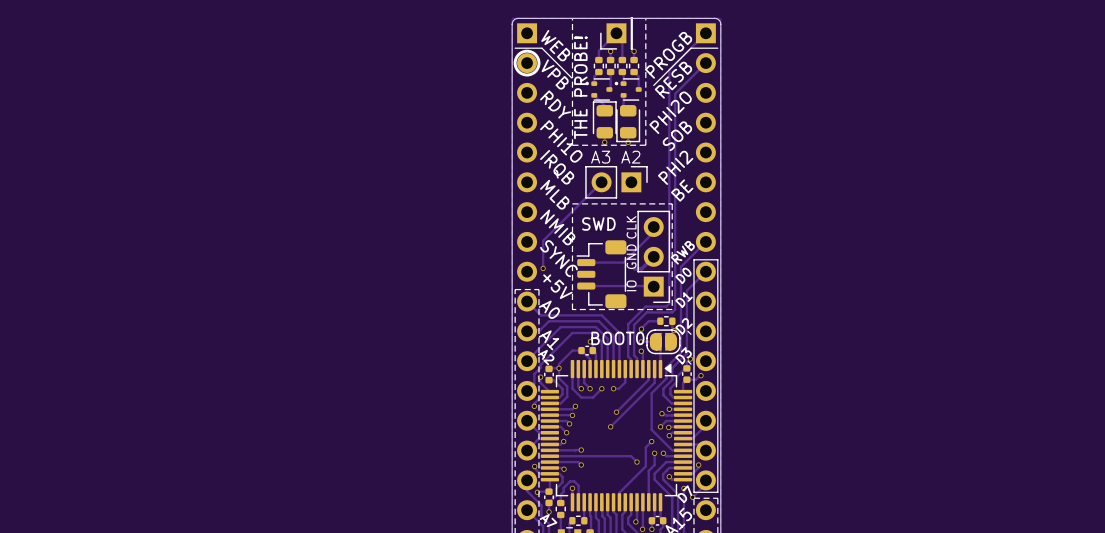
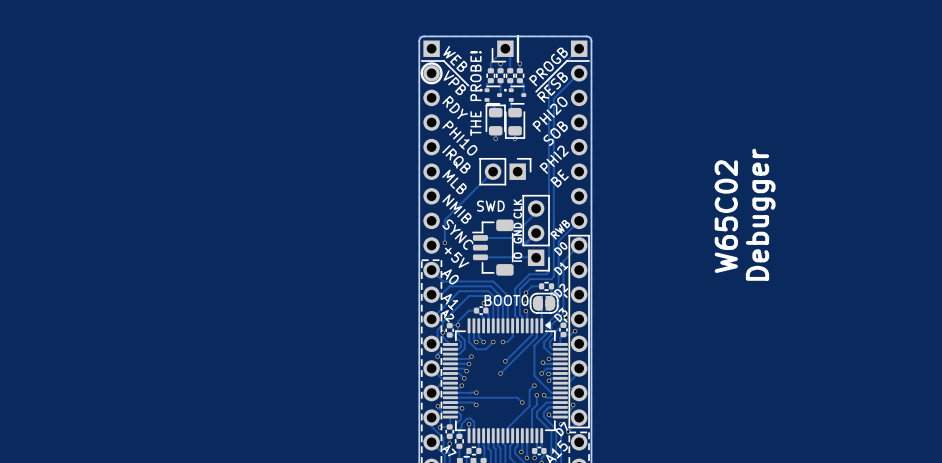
line: (572, 19) (572, 145) (645, 145) (645, 19) -> none
text: A3 (600, 157) -> none
text: A2 (630, 157) -> none
line: (572, 203) (572, 309) (672, 309) (672, 203) (572, 203) -> none
text: none -> Debugger (760, 214)
text: none -> W65C02 (726, 216)

